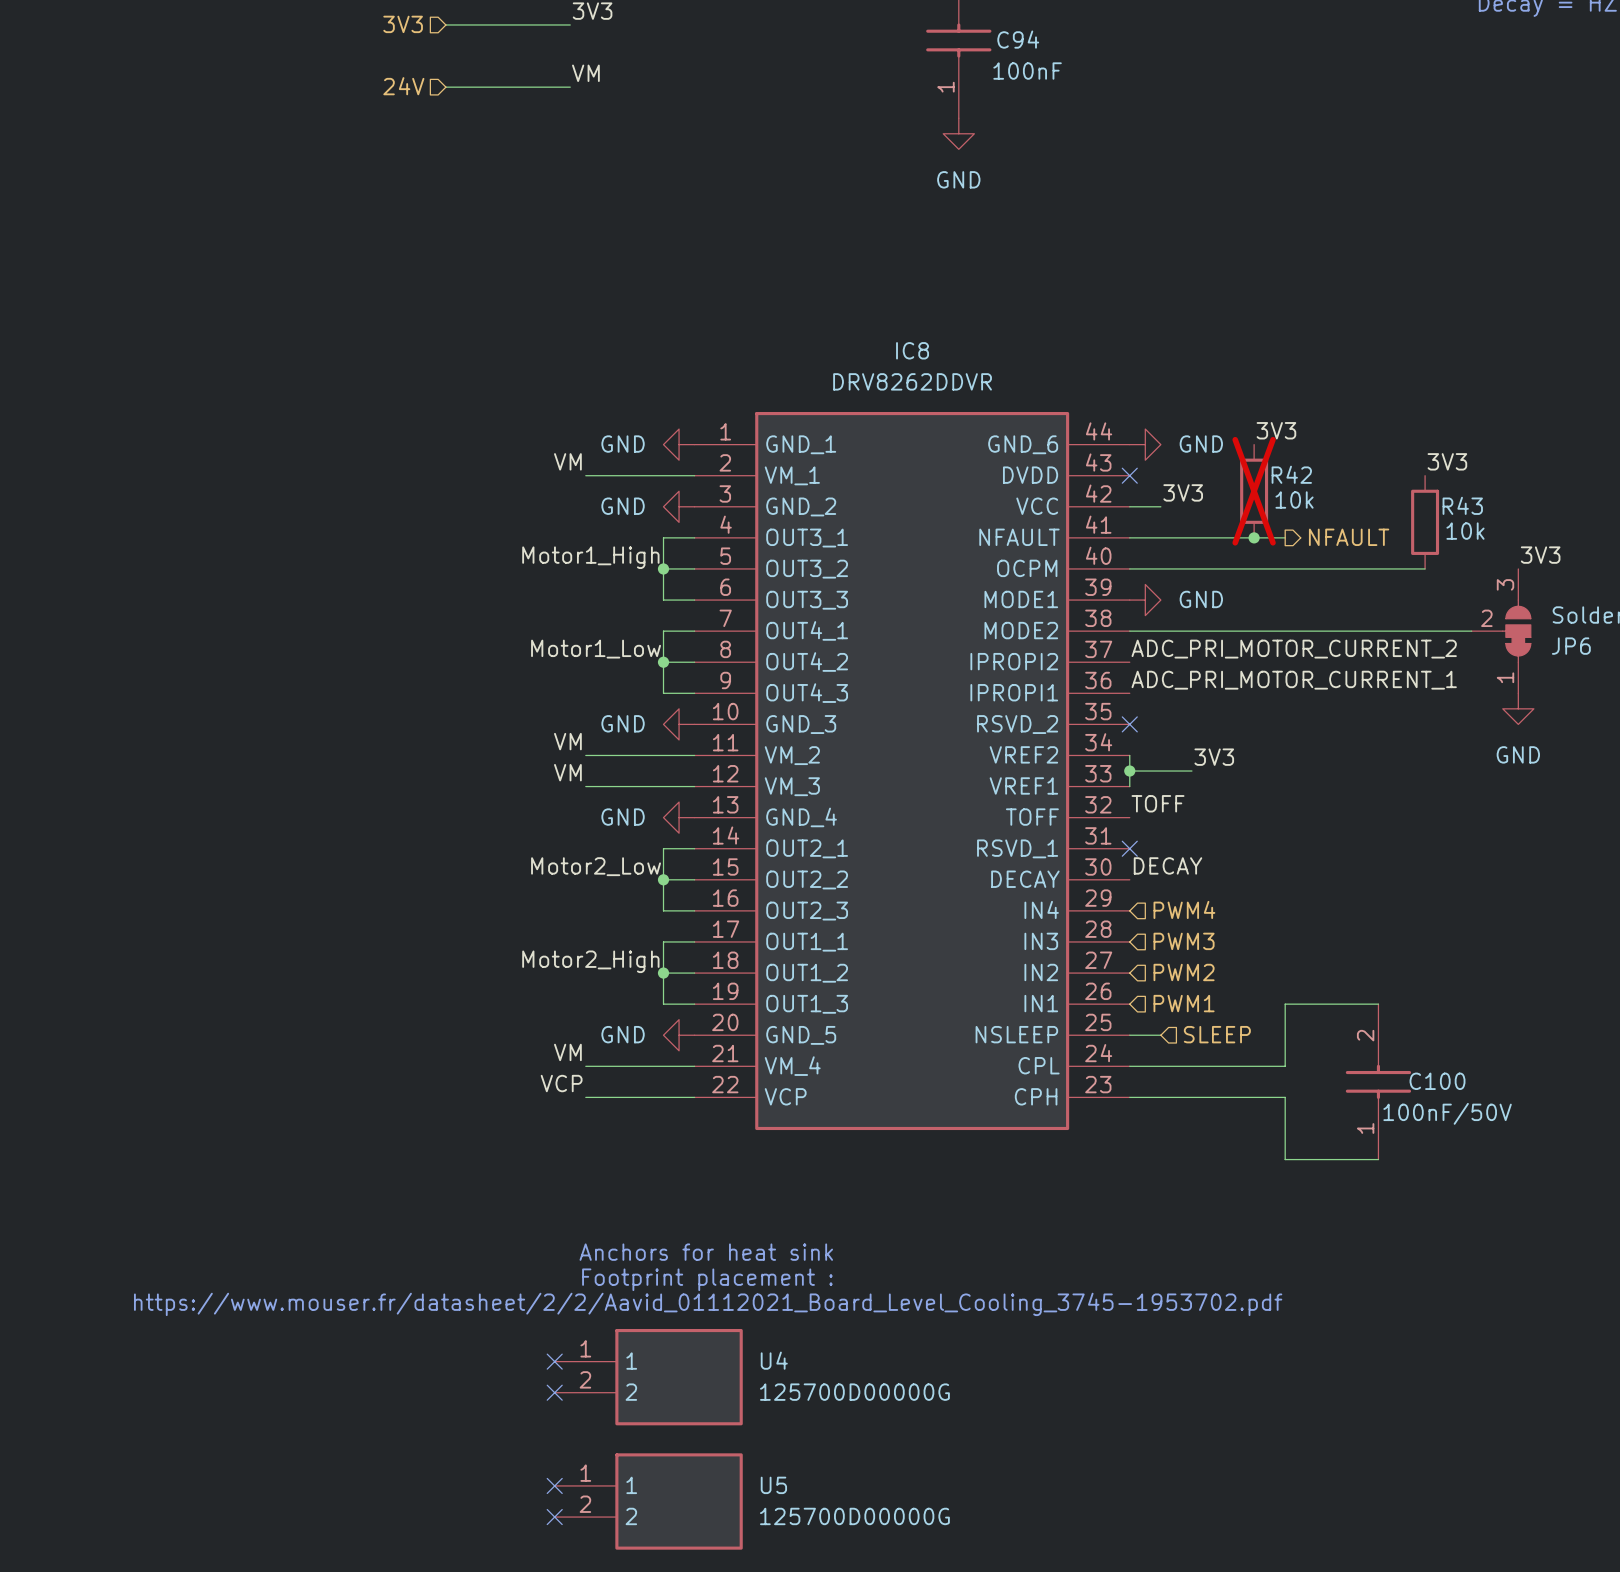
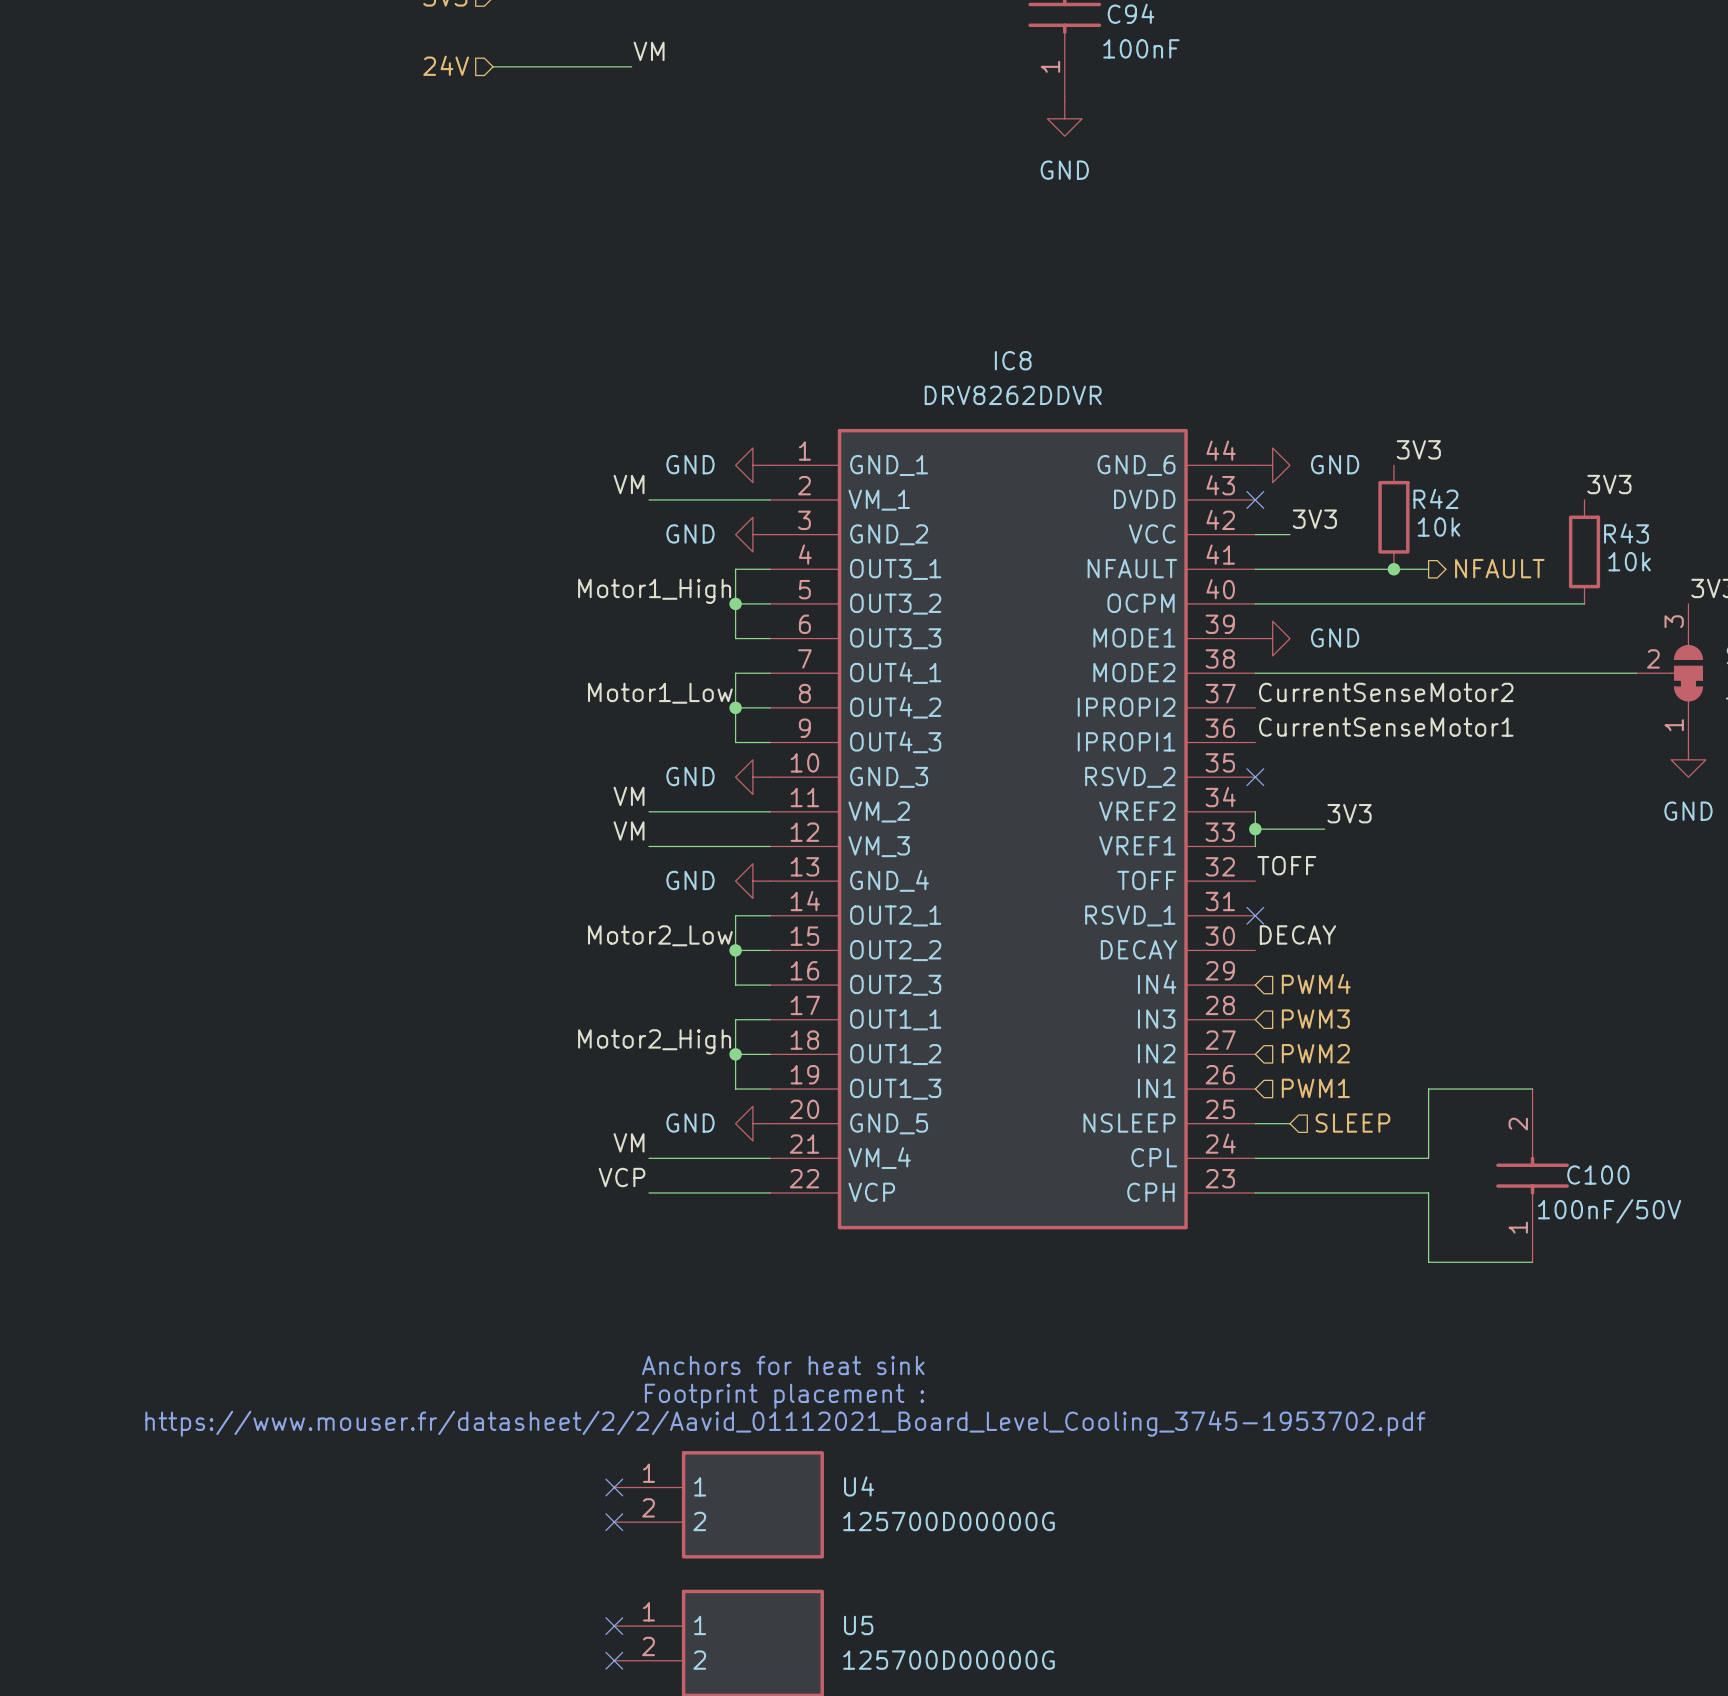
R42 do-not-place cross: (1254, 491) -> none
label: ADC_PRI_MOTOR_CURRENT_2 (1294, 649) -> CurrentSenseMotor2 (1386, 692)
label: ADC_PRI_MOTOR_CURRENT_1 (1294, 680) -> CurrentSenseMotor1 (1386, 727)

